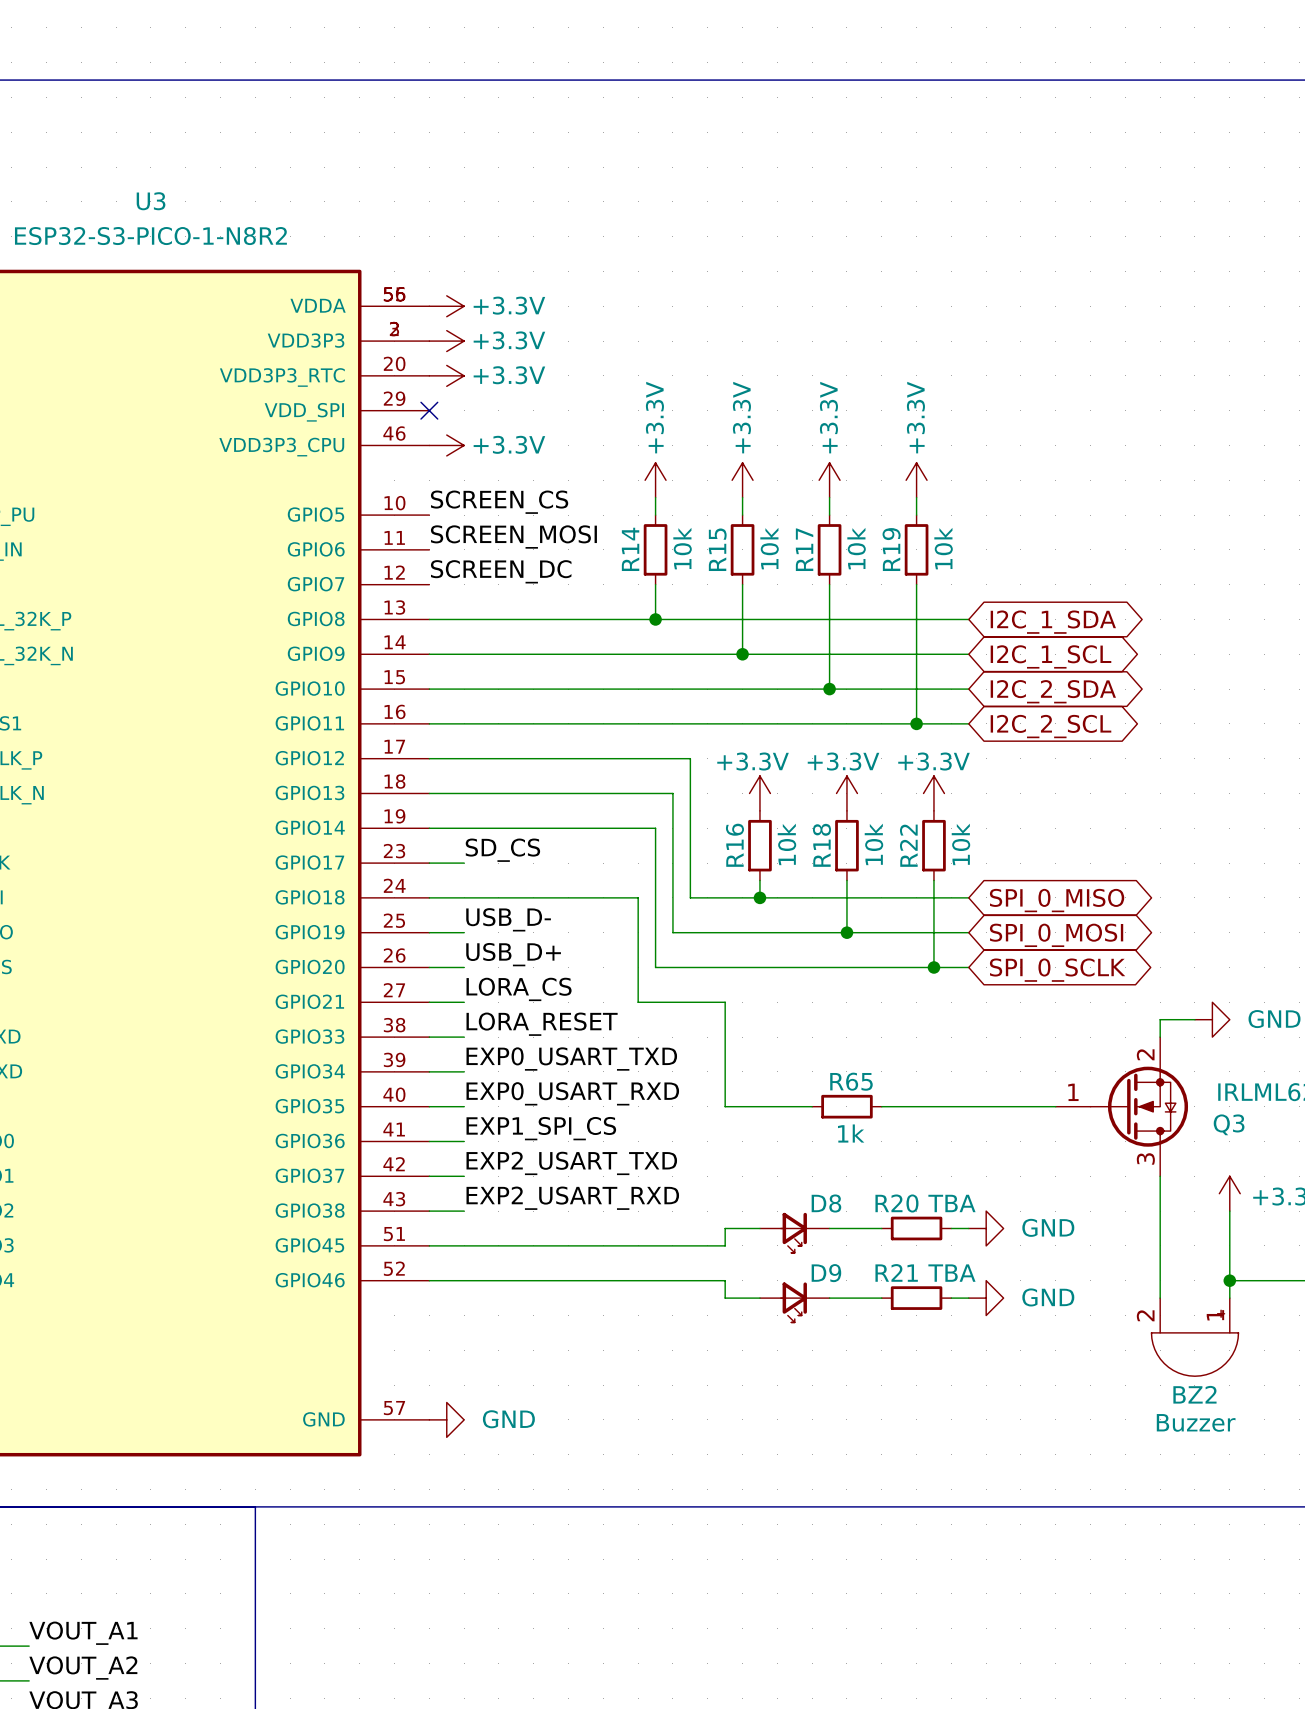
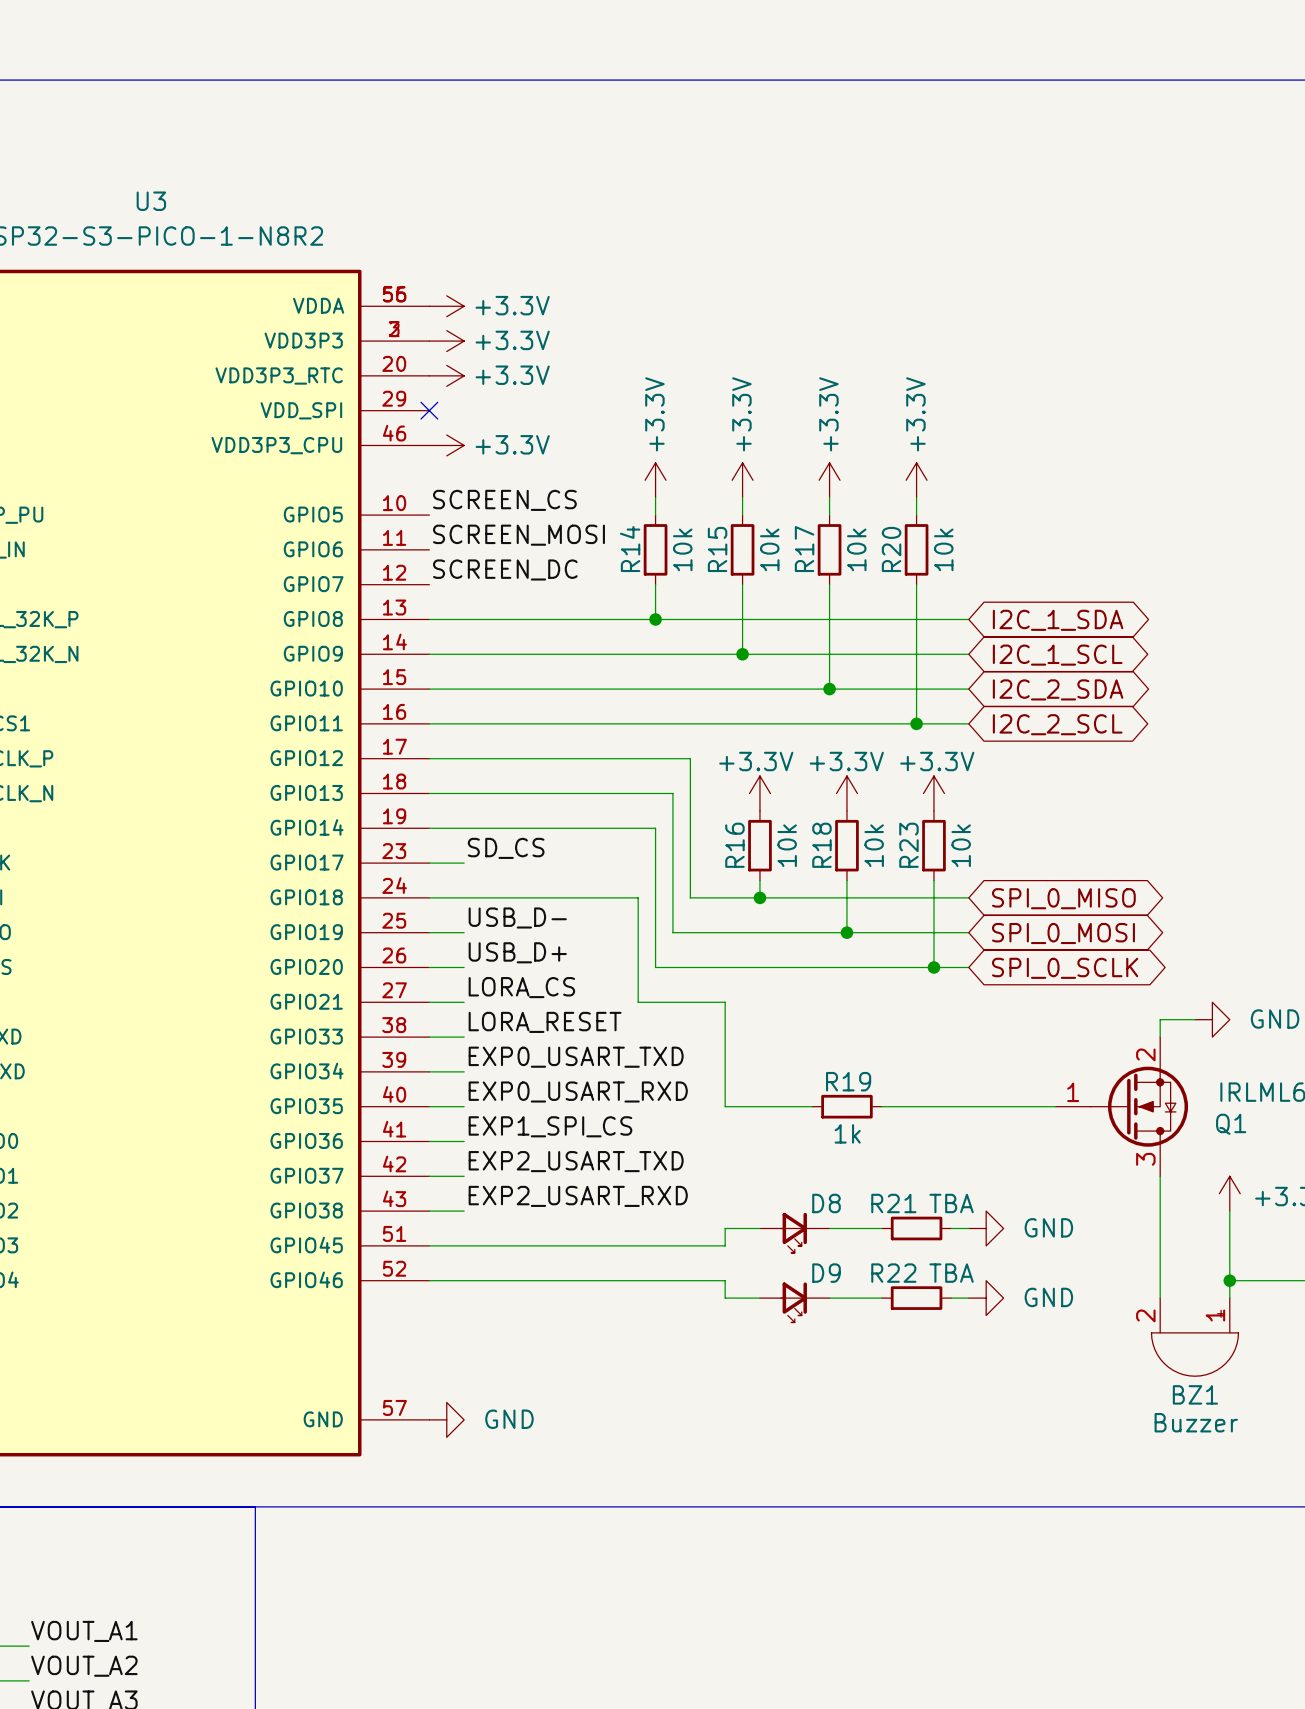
R19 name: R19 (891, 549) -> R20 (891, 549)
R22 name: R22 (908, 845) -> R23 (908, 845)
R65 name: R65 (851, 1081) -> R19 (848, 1081)
Q3 name: Q3 (1229, 1124) -> Q1 (1231, 1124)
R20 name: R20 (896, 1203) -> R21 (893, 1203)
R21 name: R21 (896, 1272) -> R22 (893, 1273)
BZ2 name: BZ2 (1194, 1394) -> BZ1 (1195, 1394)

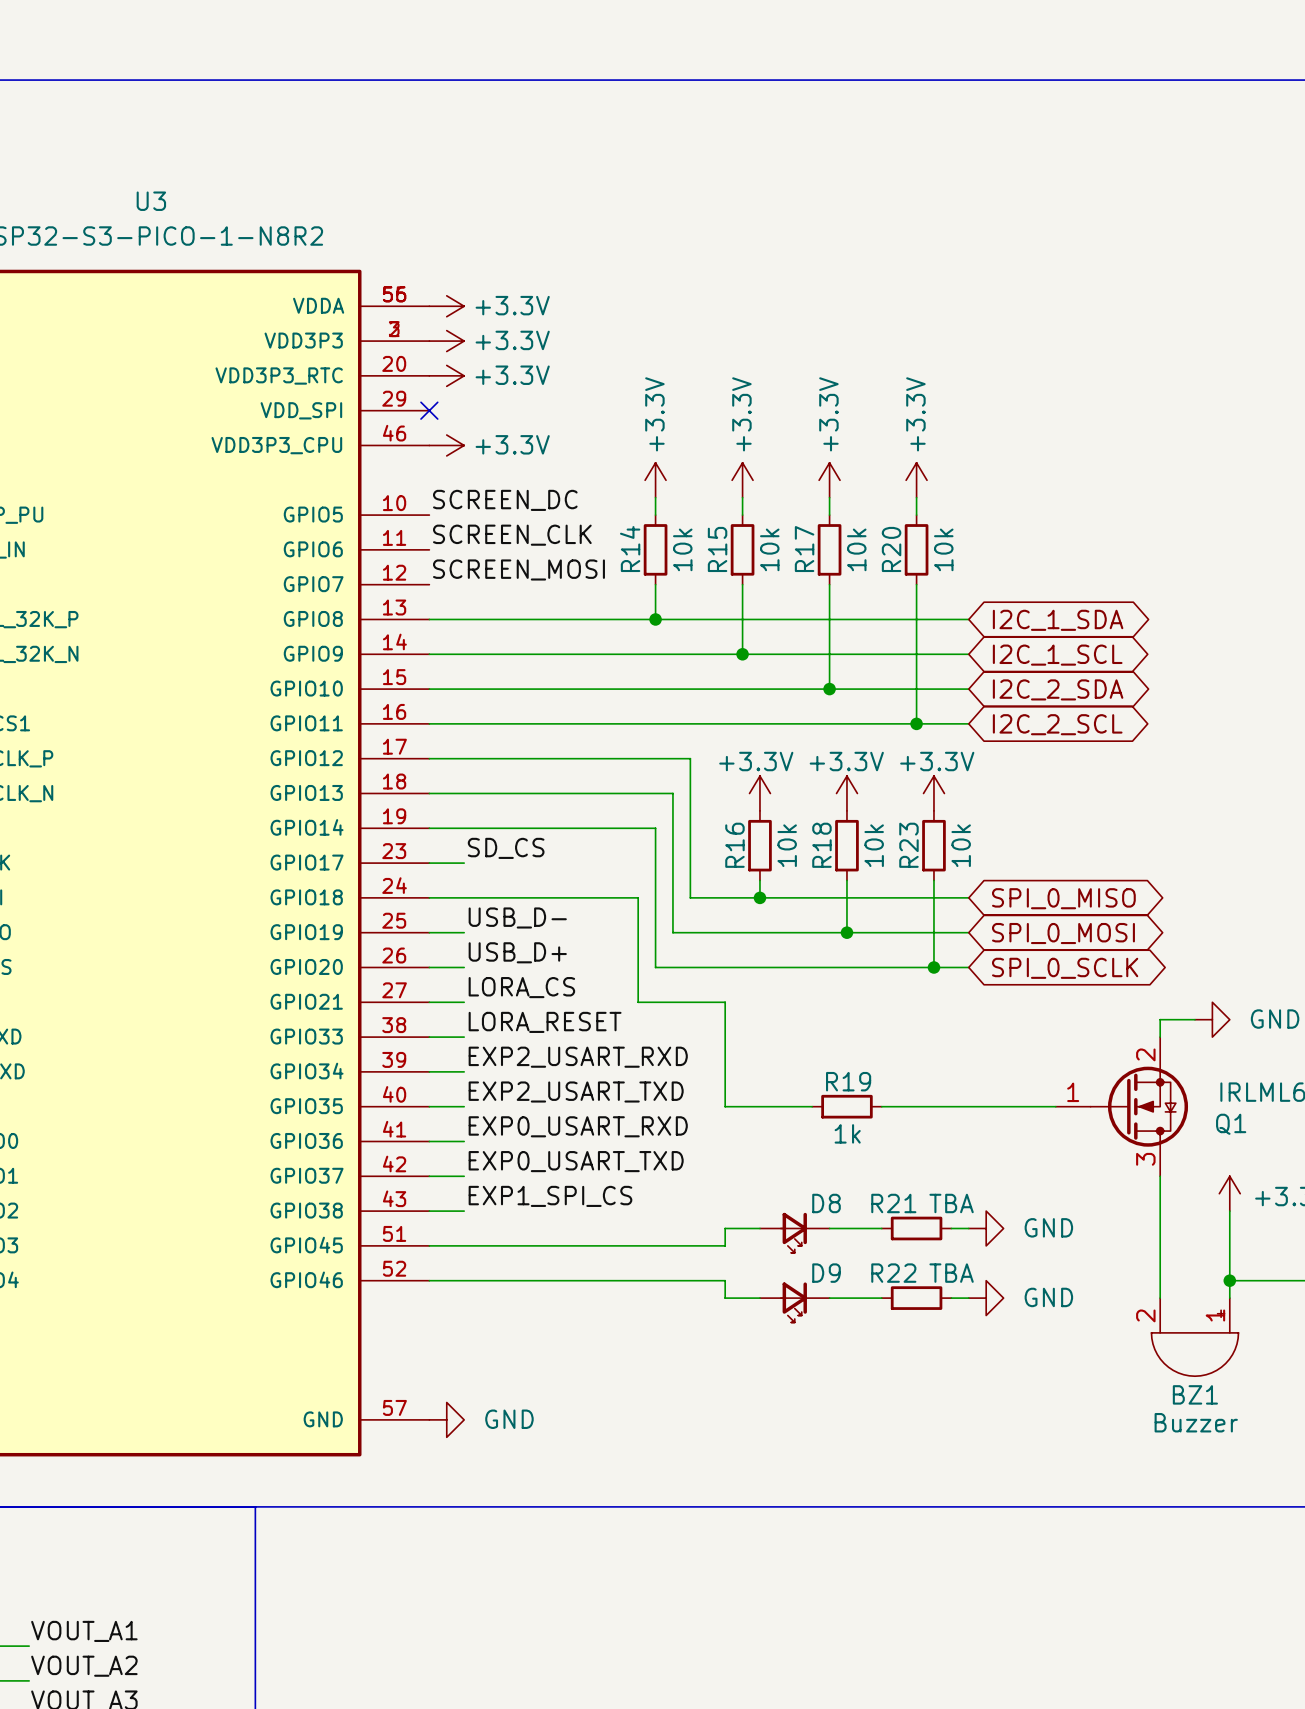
label: SCREEN_CS (504, 500) -> SCREEN_DC (505, 500)
label: SCREEN_MOSI (518, 535) -> SCREEN_CLK (512, 535)
label: SCREEN_DC (505, 569) -> SCREEN_MOSI (518, 569)
label: EXP0_USART_TXD (576, 1057) -> EXP2_USART_RXD (578, 1057)
label: EXP0_USART_RXD (578, 1091) -> EXP2_USART_TXD (576, 1091)
label: EXP1_SPI_CS (550, 1126) -> EXP0_USART_RXD (578, 1126)
label: EXP2_USART_TXD (576, 1161) -> EXP0_USART_TXD (576, 1161)
label: EXP2_USART_RXD (578, 1196) -> EXP1_SPI_CS (550, 1196)

